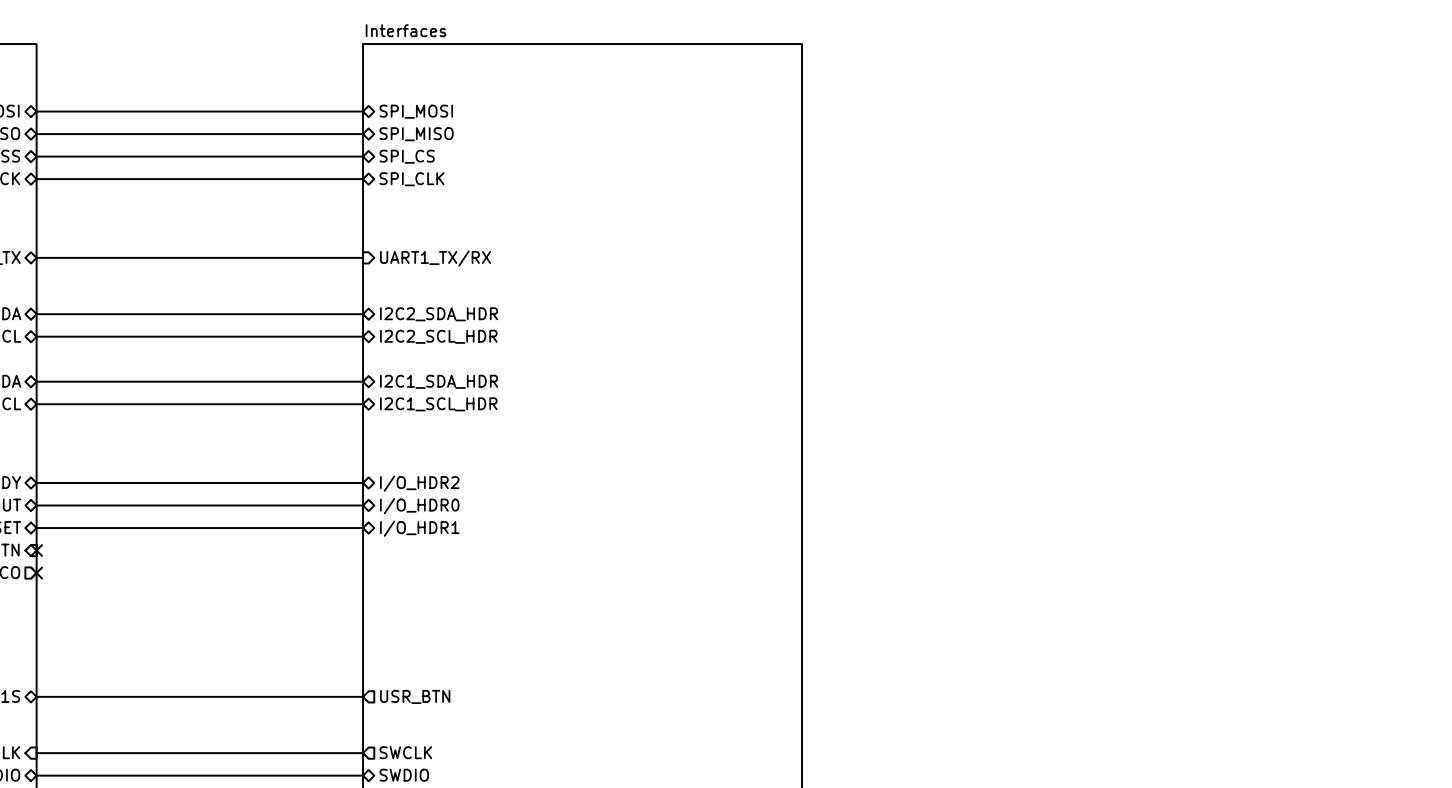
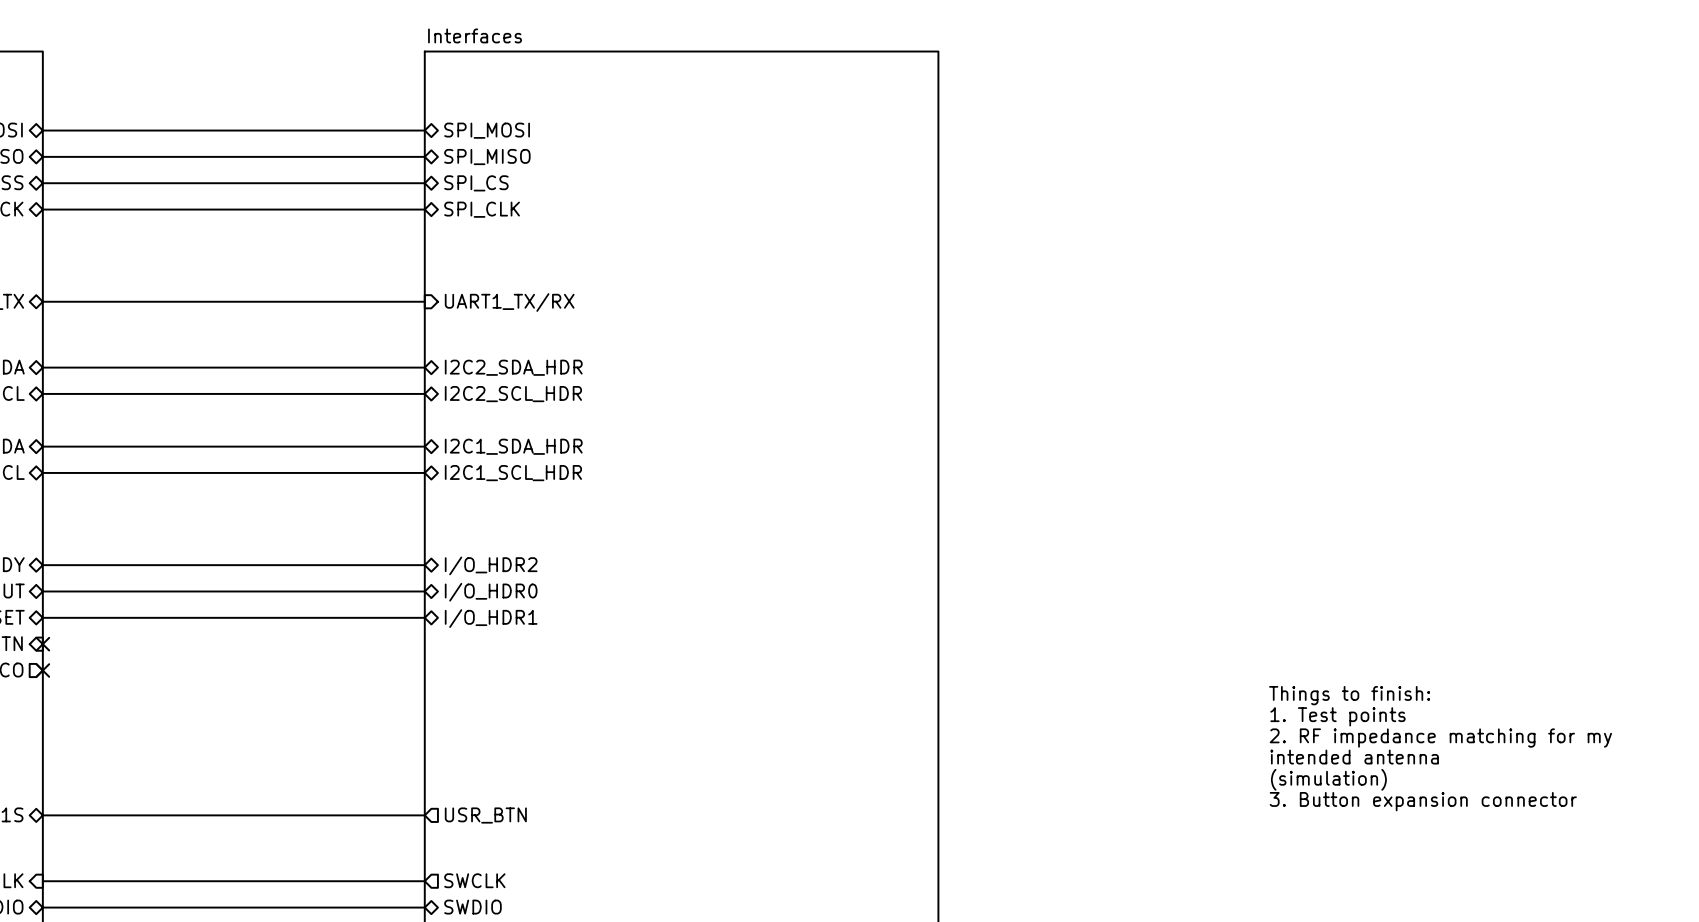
text: none -> Things to finish: (1349, 695)
text: none -> 1. Test points (1337, 716)
text: none -> 2. RF impedance matching for my (1440, 738)
text: none -> intended antenna (1354, 757)
text: none -> (simulation) (1328, 779)
text: none -> 3. Button expansion connector (1423, 801)

